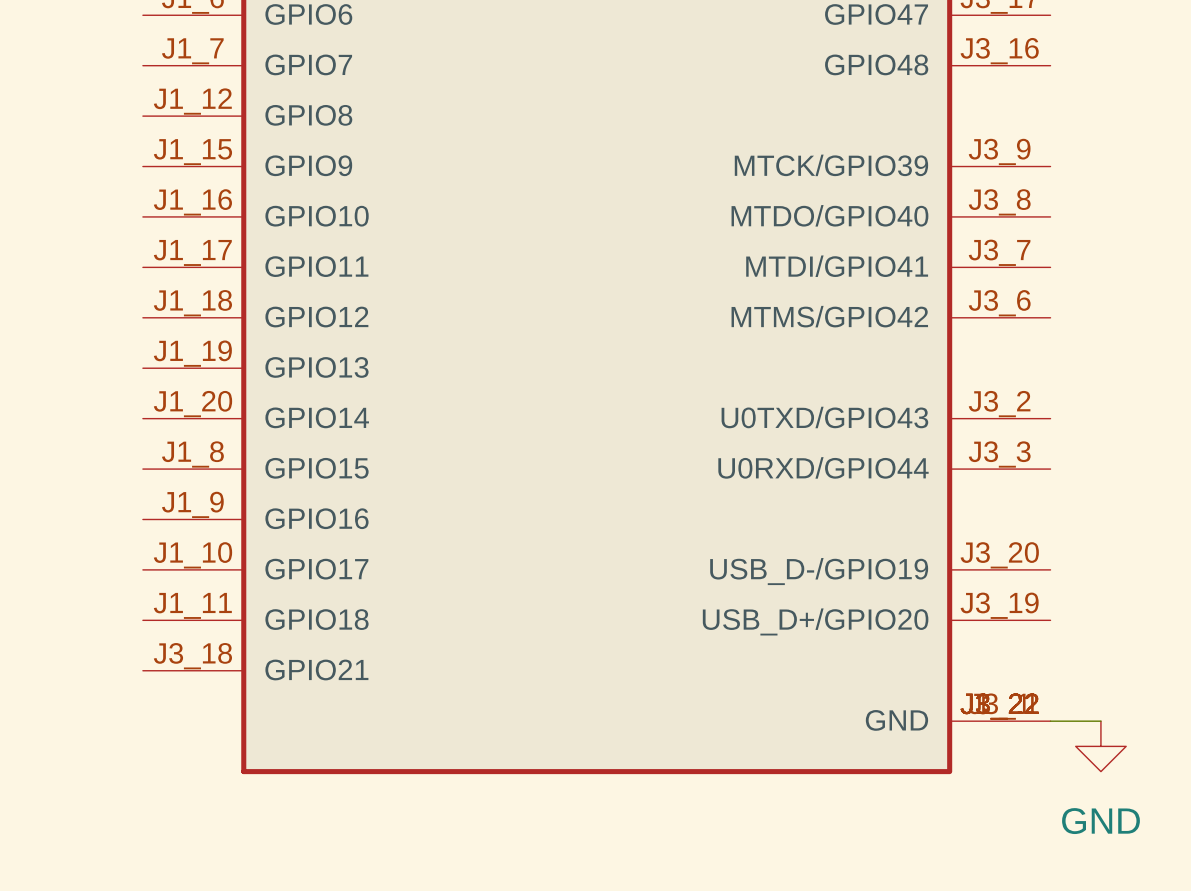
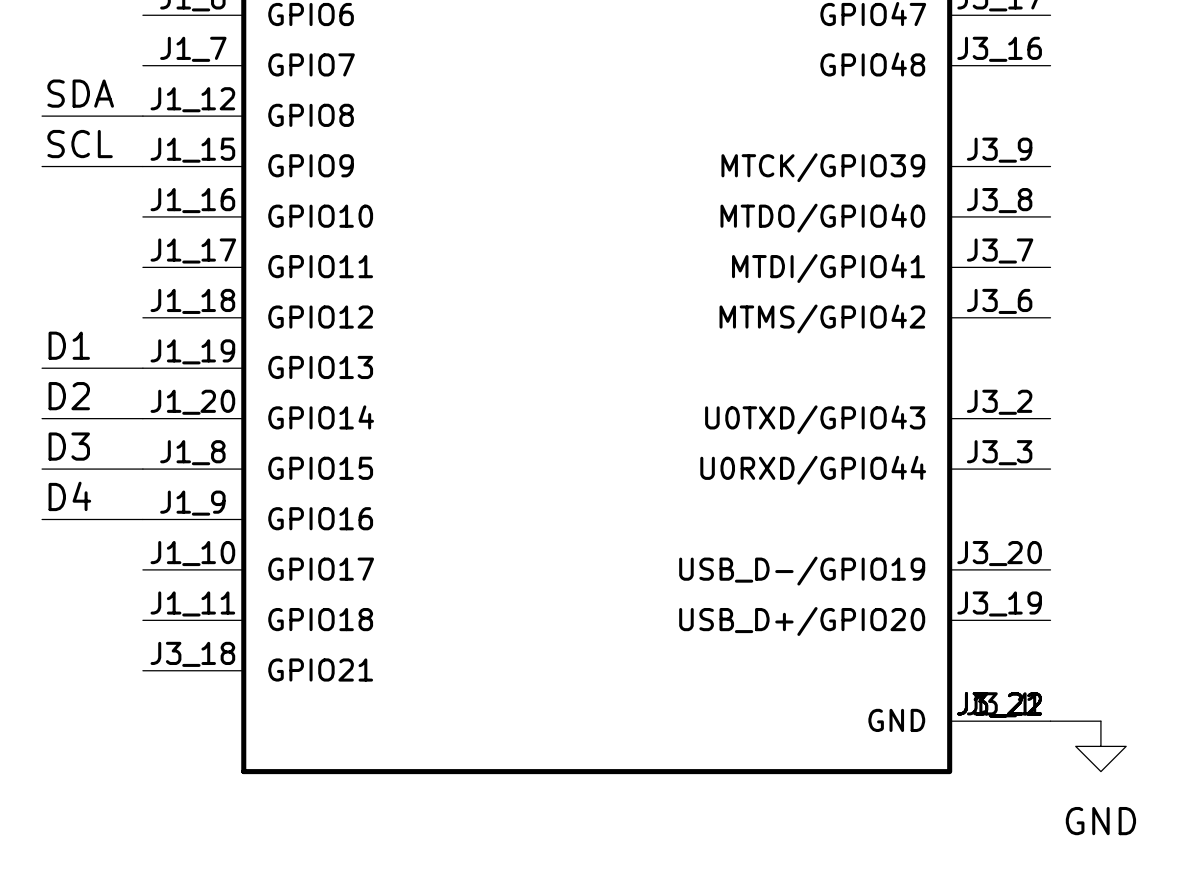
label: none -> SDA (80, 93)
wire: none -> (42, 116) (142, 116)
label: none -> SCL (80, 144)
wire: none -> (42, 166) (142, 166)
label: none -> D1 (69, 345)
wire: none -> (42, 368) (142, 368)
label: none -> D2 (69, 396)
wire: none -> (42, 418) (142, 418)
label: none -> D3 (69, 446)
wire: none -> (42, 469) (142, 469)
label: none -> D4 (69, 496)
wire: none -> (42, 519) (142, 519)

